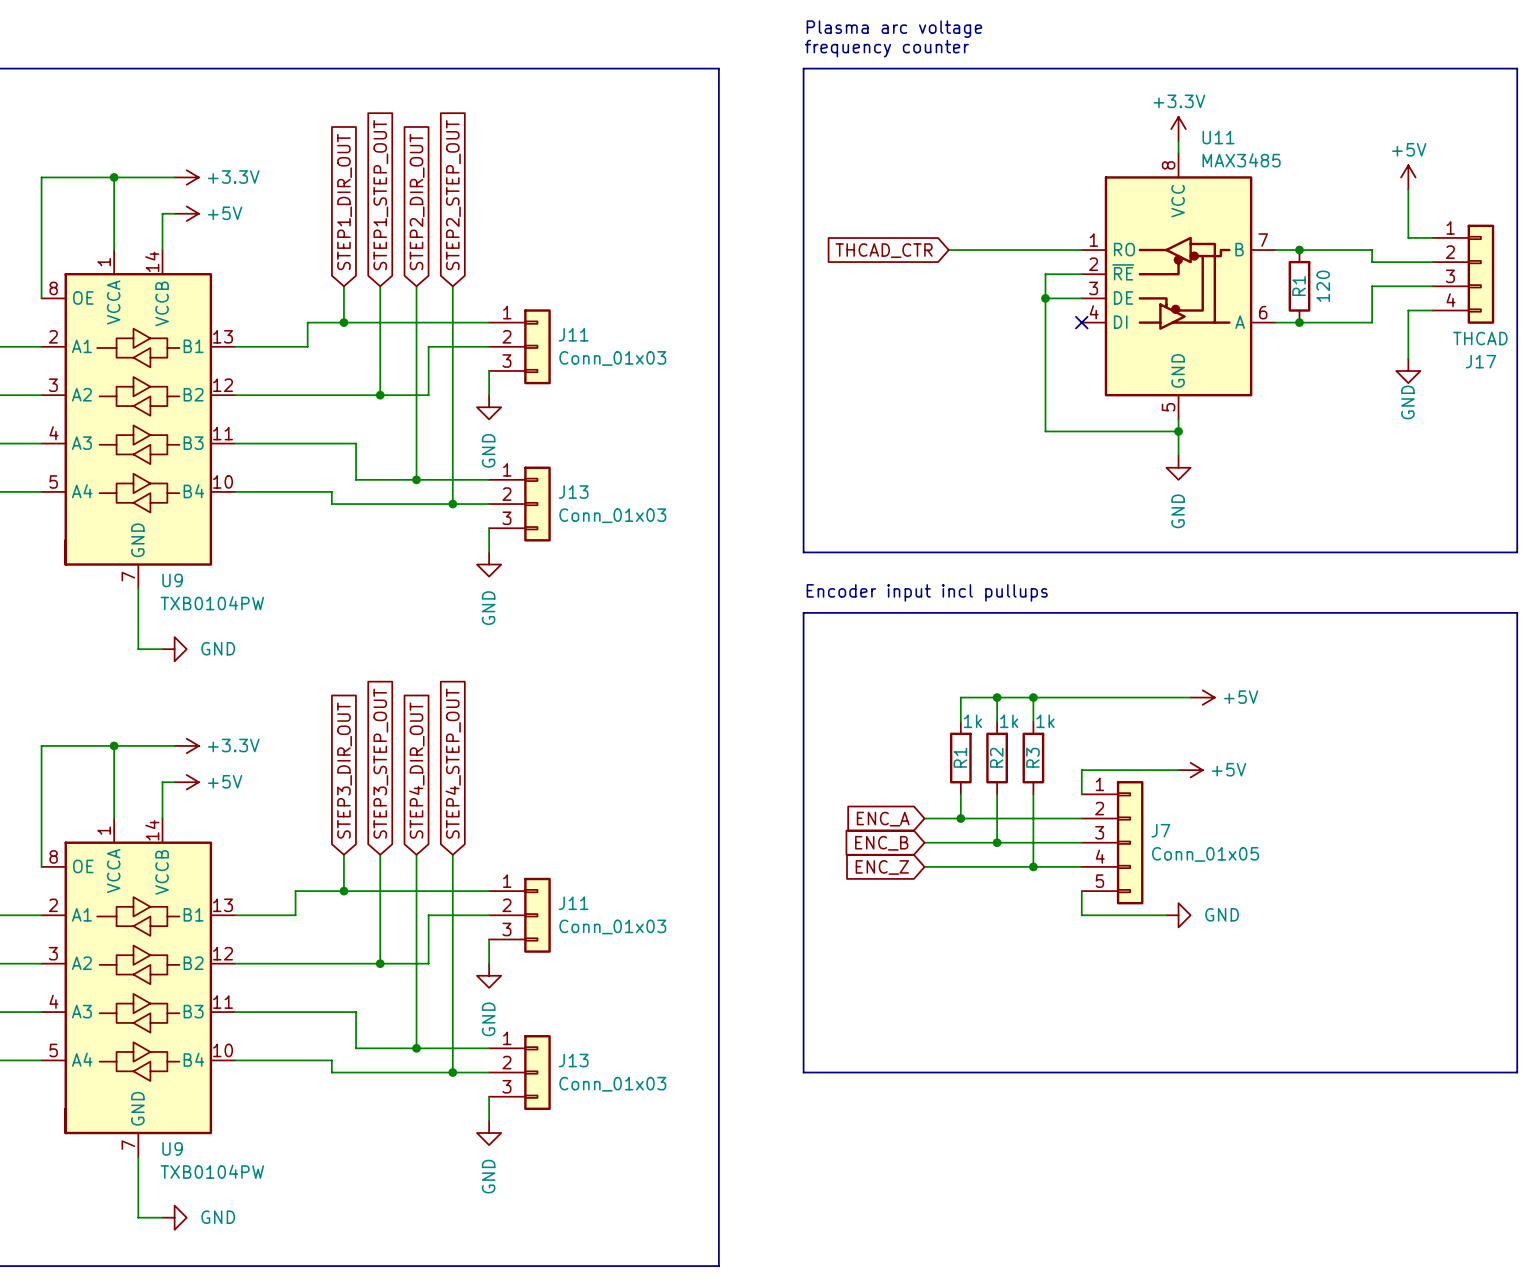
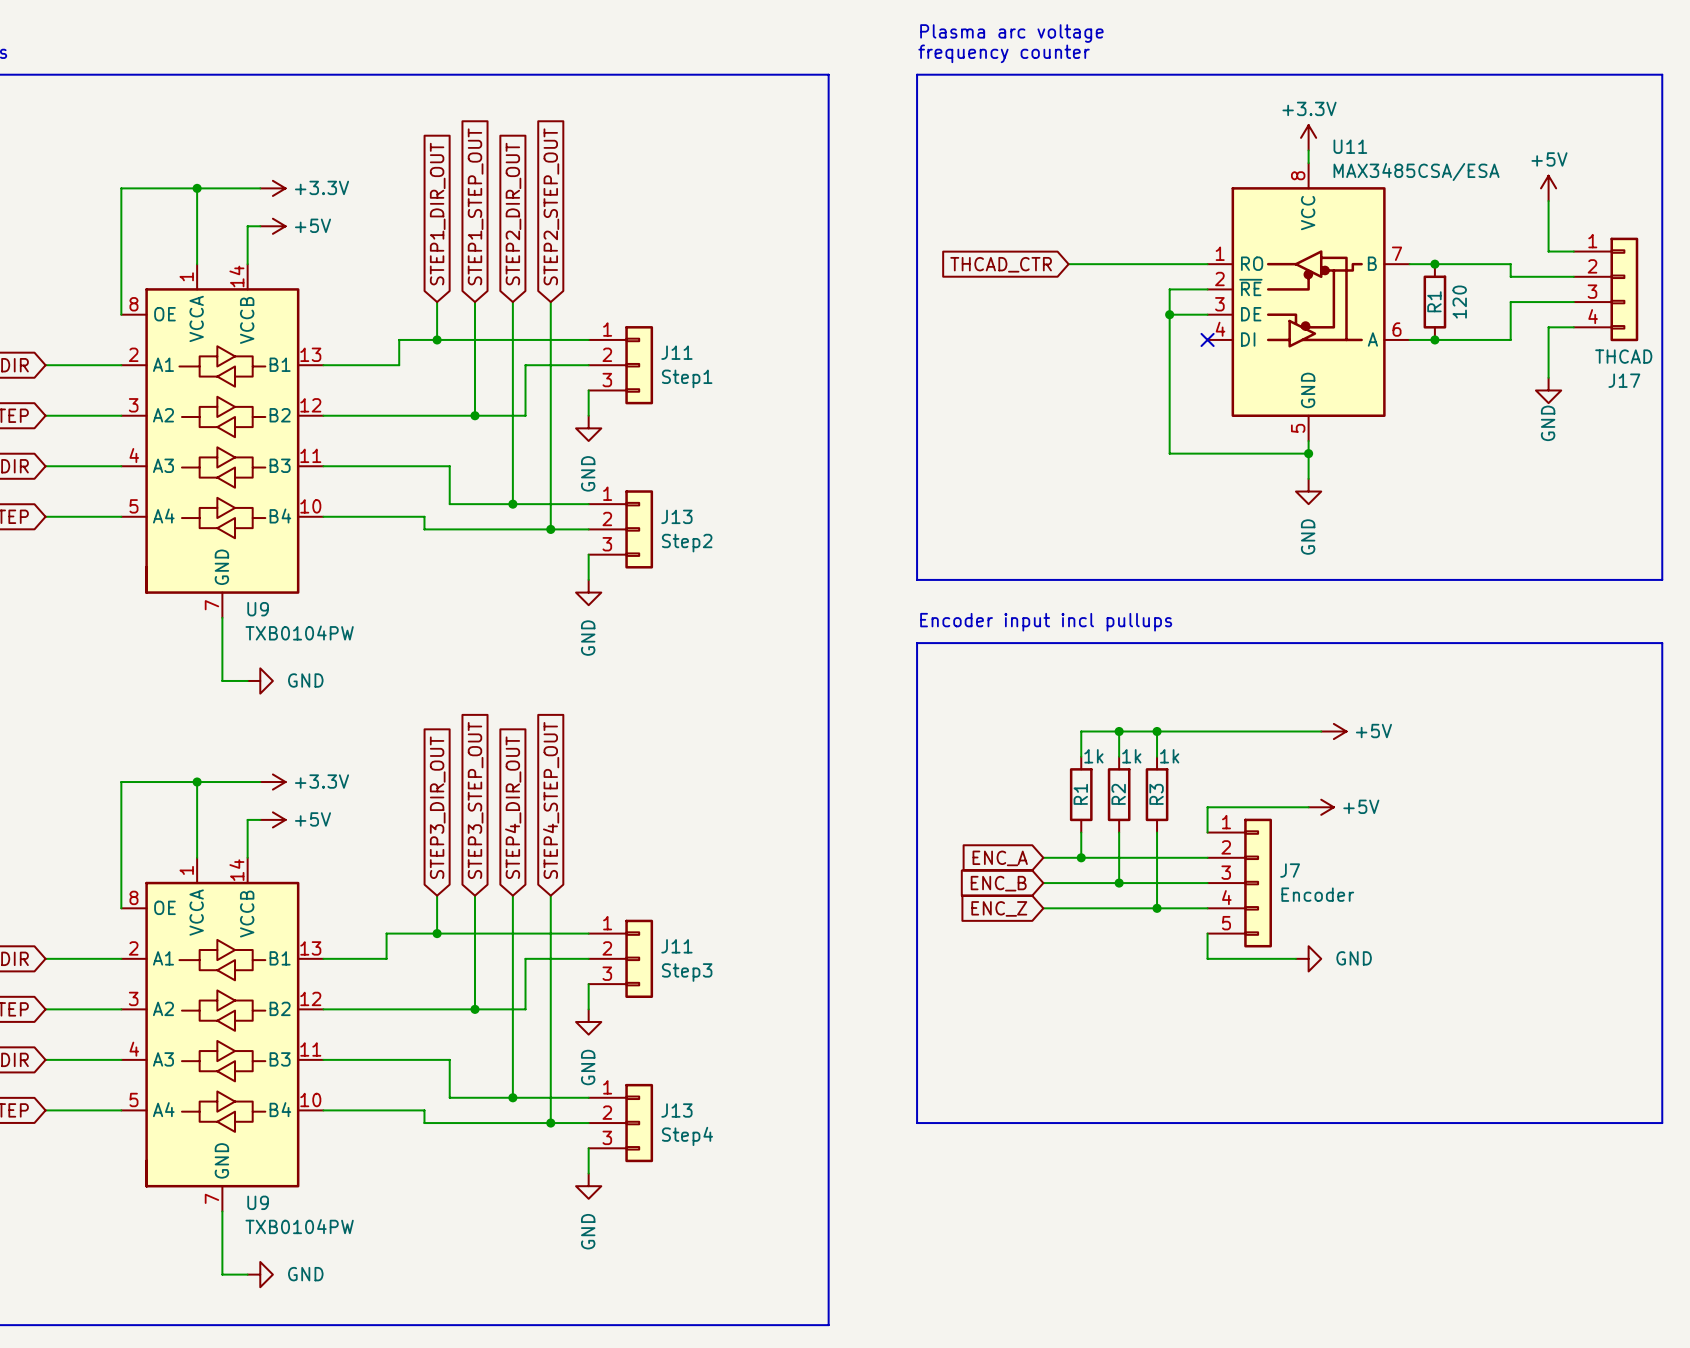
U11 value: MAX3485 (1241, 160) -> MAX3485CSA/ESA (1416, 172)
J11 value: Conn_01x03 (612, 358) -> Step1 (687, 378)
J13 value: Conn_01x03 (612, 515) -> Step2 (687, 543)
J7 value: Conn_01x05 (1205, 854) -> Encoder (1317, 894)
J11 value: Conn_01x03 (612, 926) -> Step3 (687, 972)
J13 value: Conn_01x03 (612, 1084) -> Step4 (687, 1136)

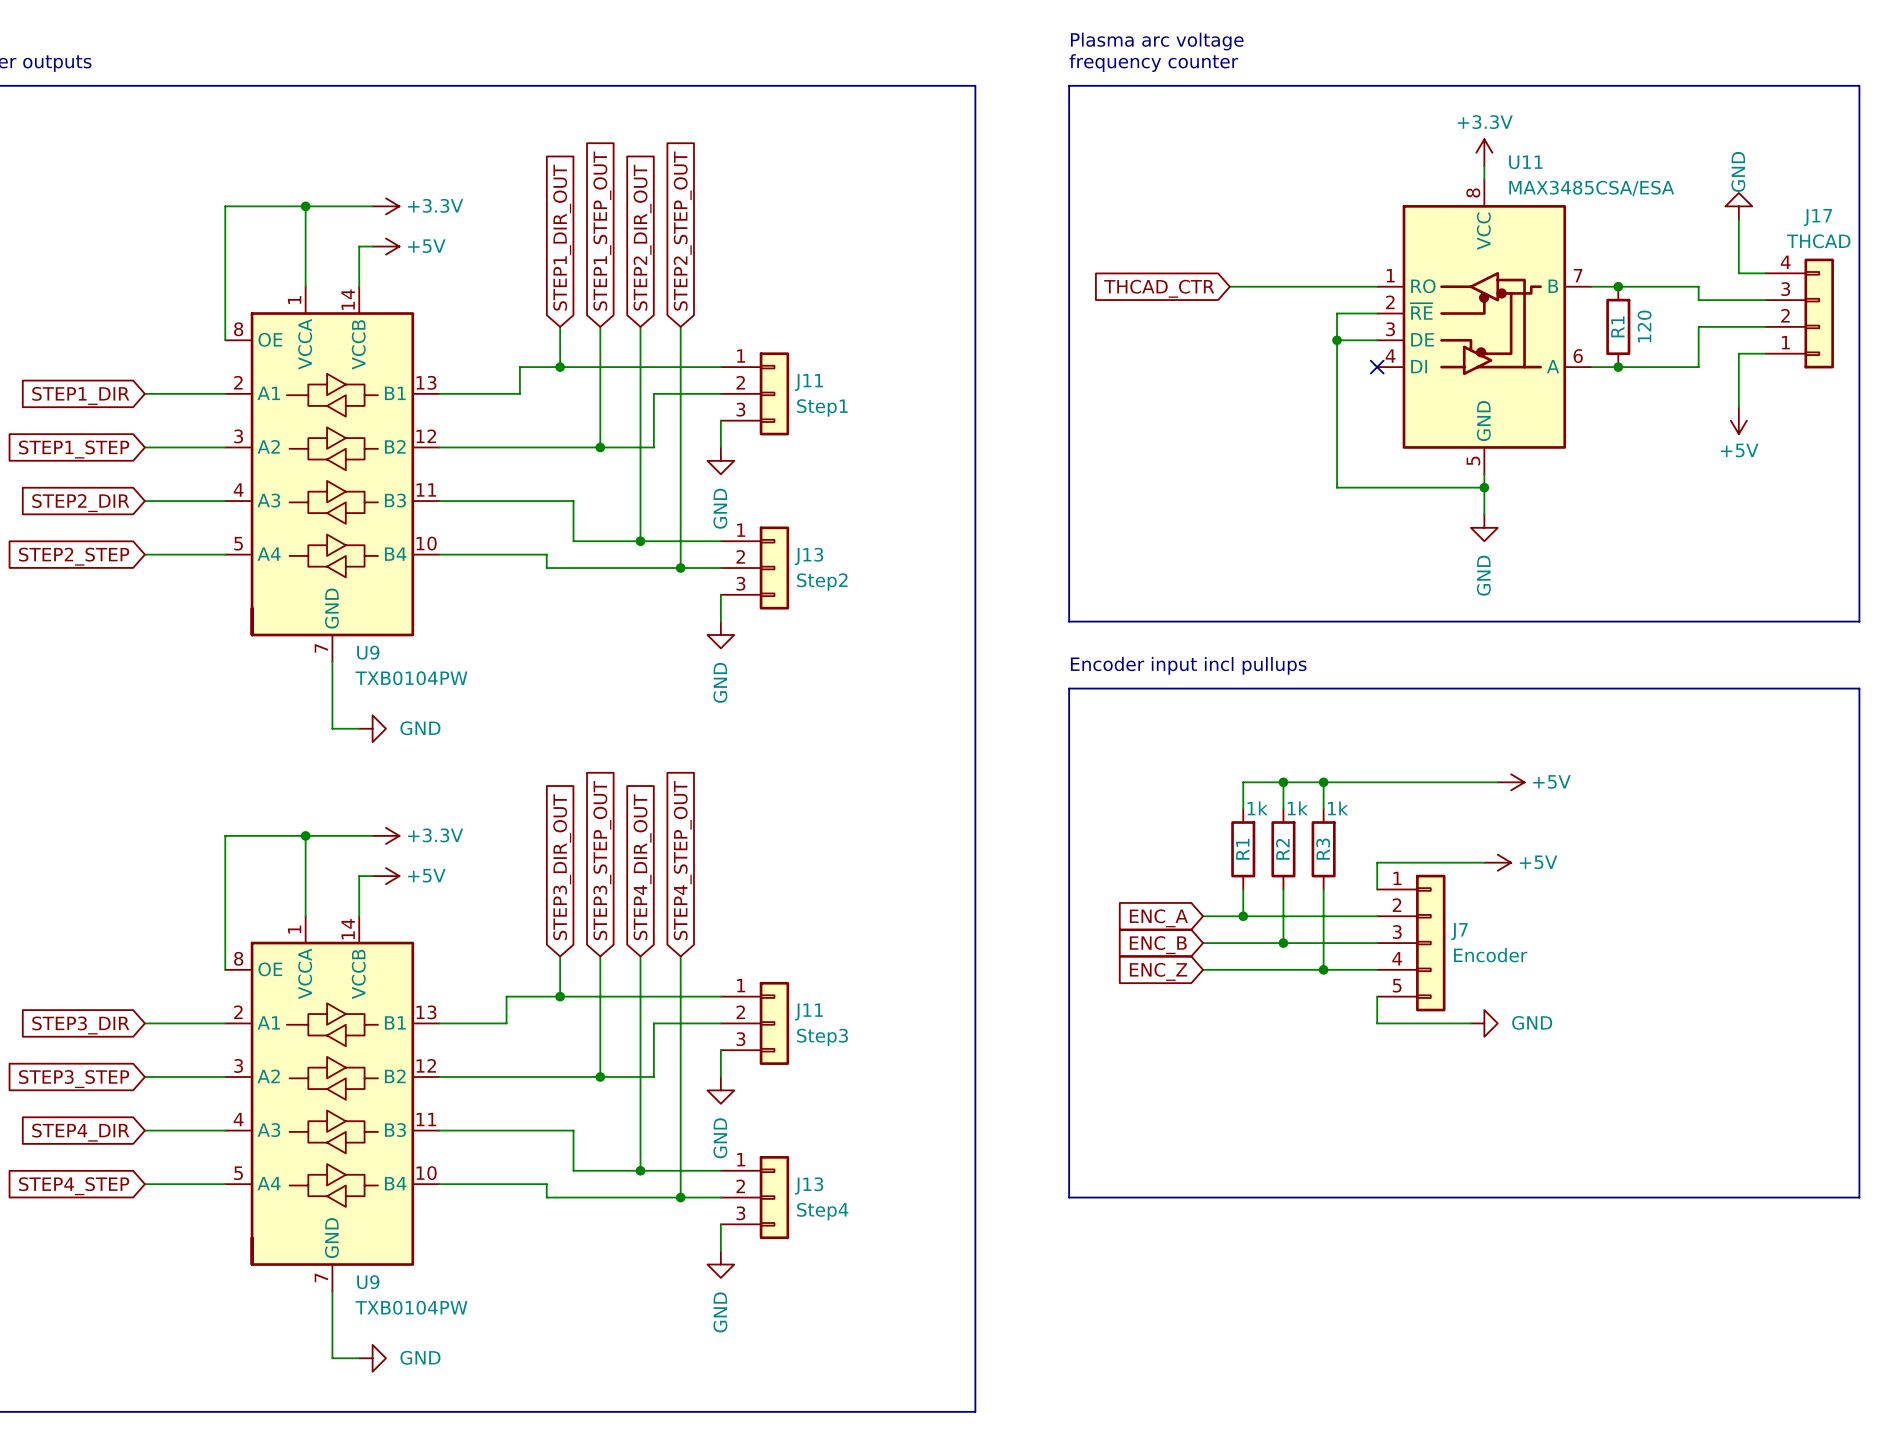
power symbol: +5V (1548, 188) -> GND (1738, 206)
J17 flip: as is (1624, 289) -> up-down (1819, 313)
power symbol: GND (1548, 390) -> +5V (1738, 420)

